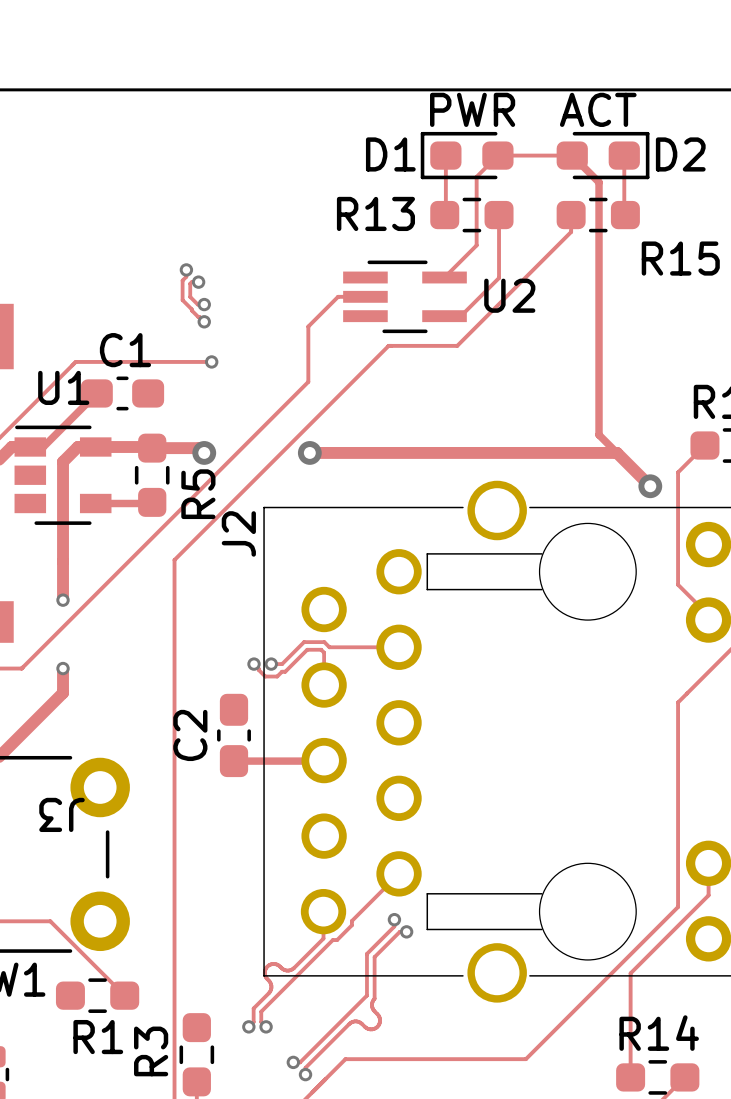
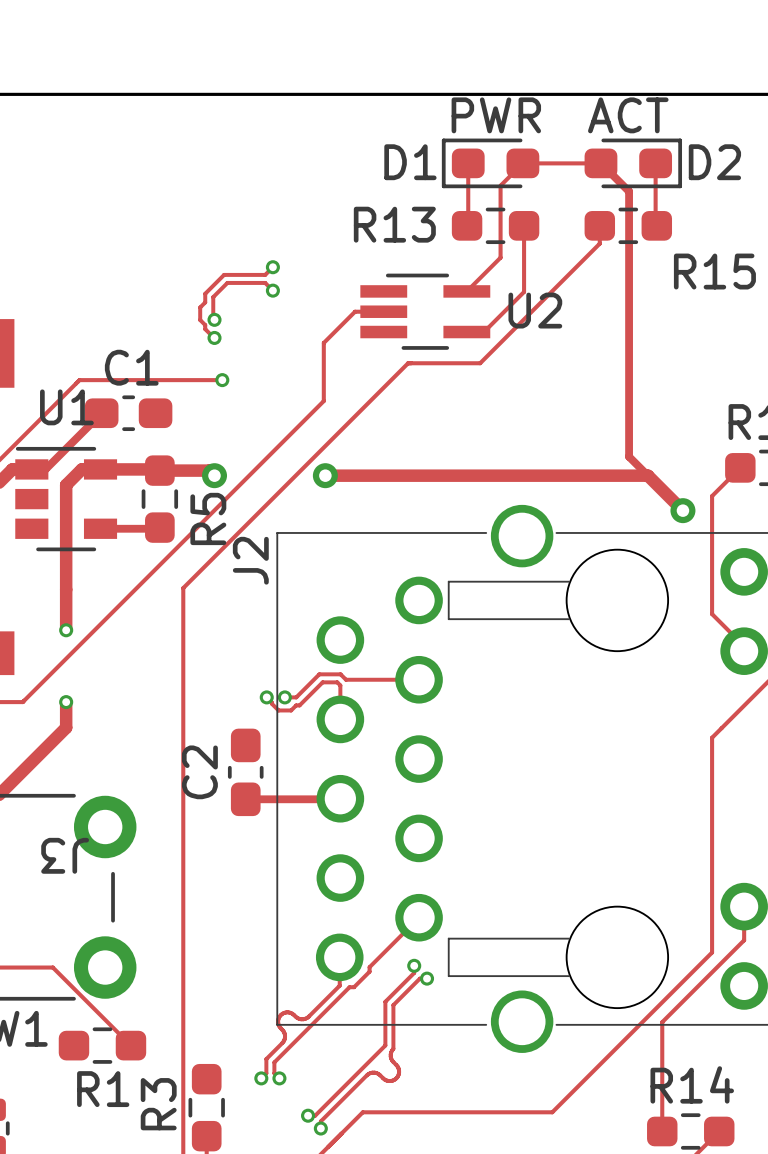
track: none -> (272, 267) (265, 274) (224, 274) (205, 293) (205, 302) (200, 307) (200, 320) (205, 325) (205, 329) (213, 337)
via: none -> (272, 267)
track: (186, 269) (186, 276) (182, 280) (182, 300) (204, 321) -> none
via: (186, 269) -> none
track: none -> (272, 290) (265, 282) (227, 282) (213, 297) (213, 313)
via: none -> (272, 290)
track: (198, 282) (190, 283) (190, 296) (197, 304) (204, 304) -> none
via: (198, 282) -> none

